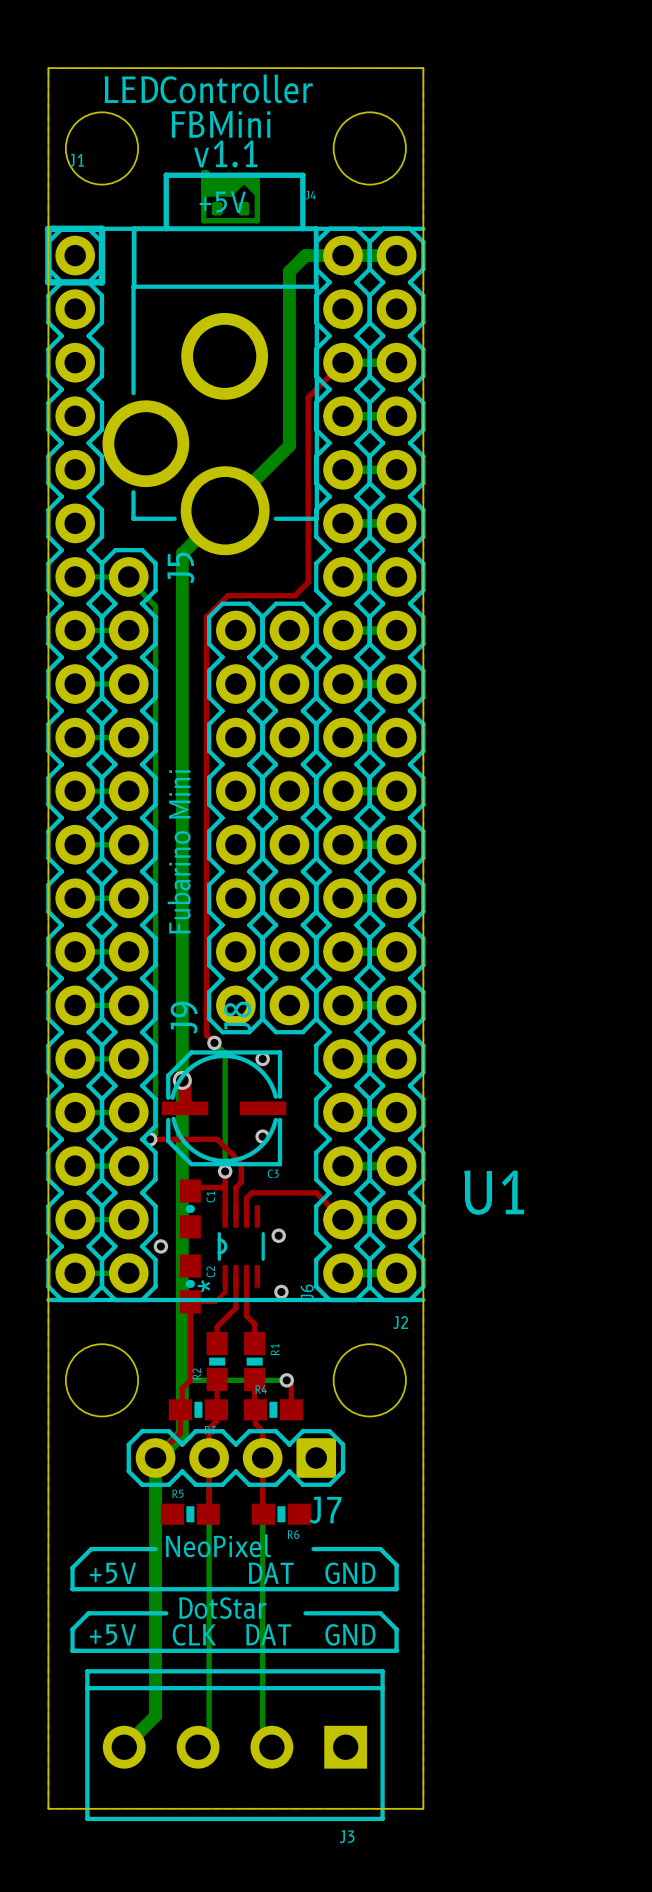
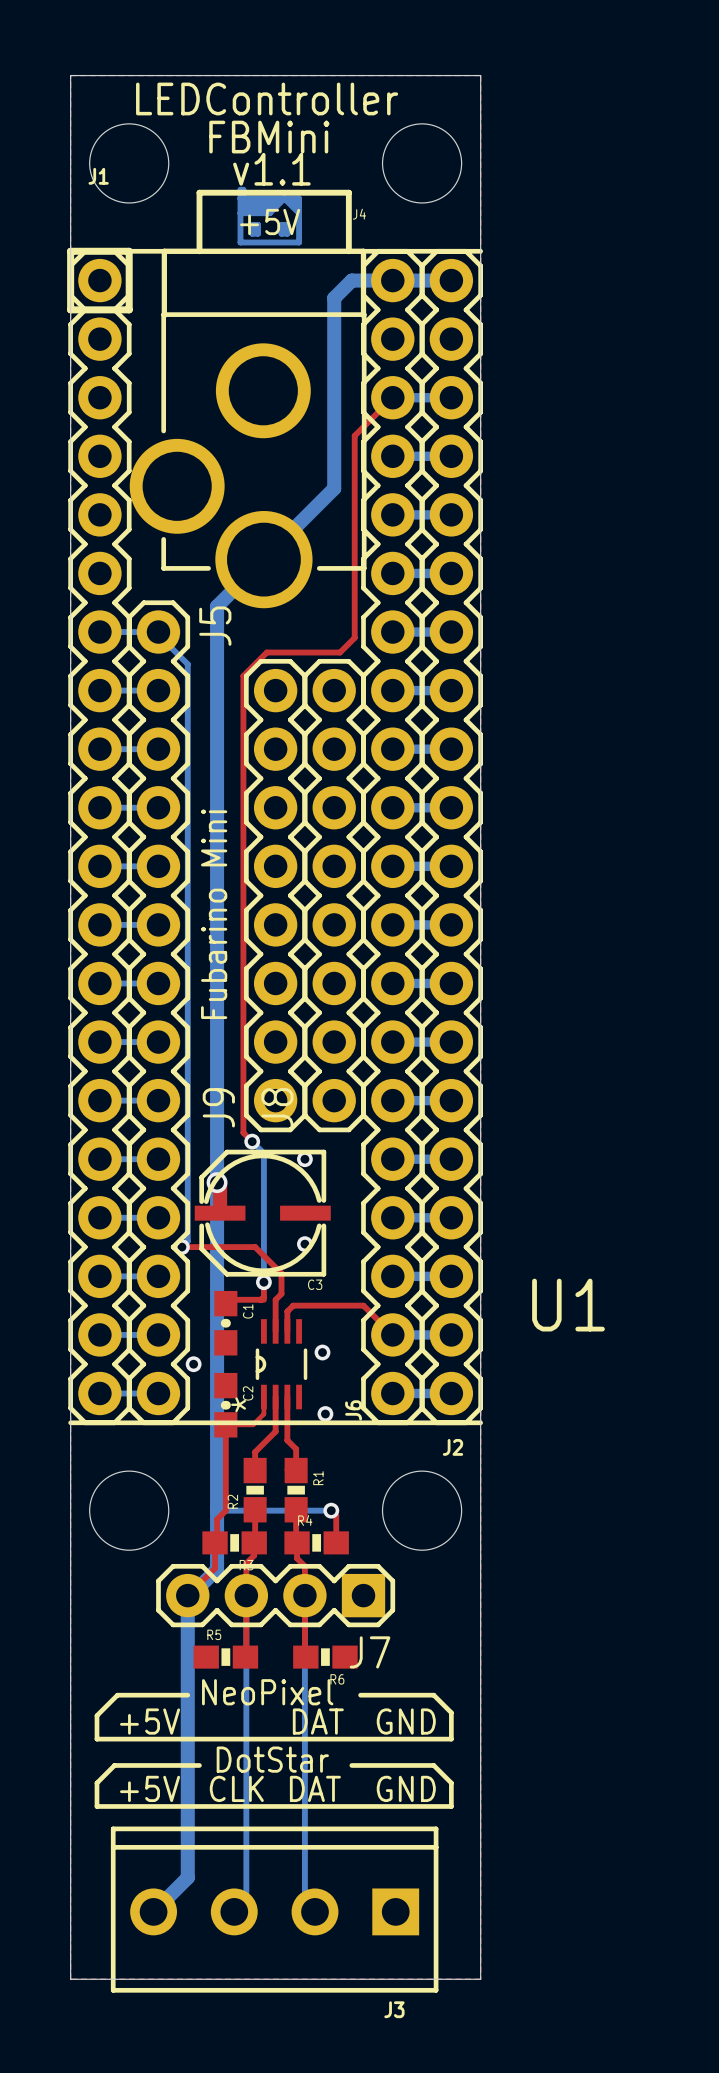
top track: (225, 1187) (225, 1216) -> none

